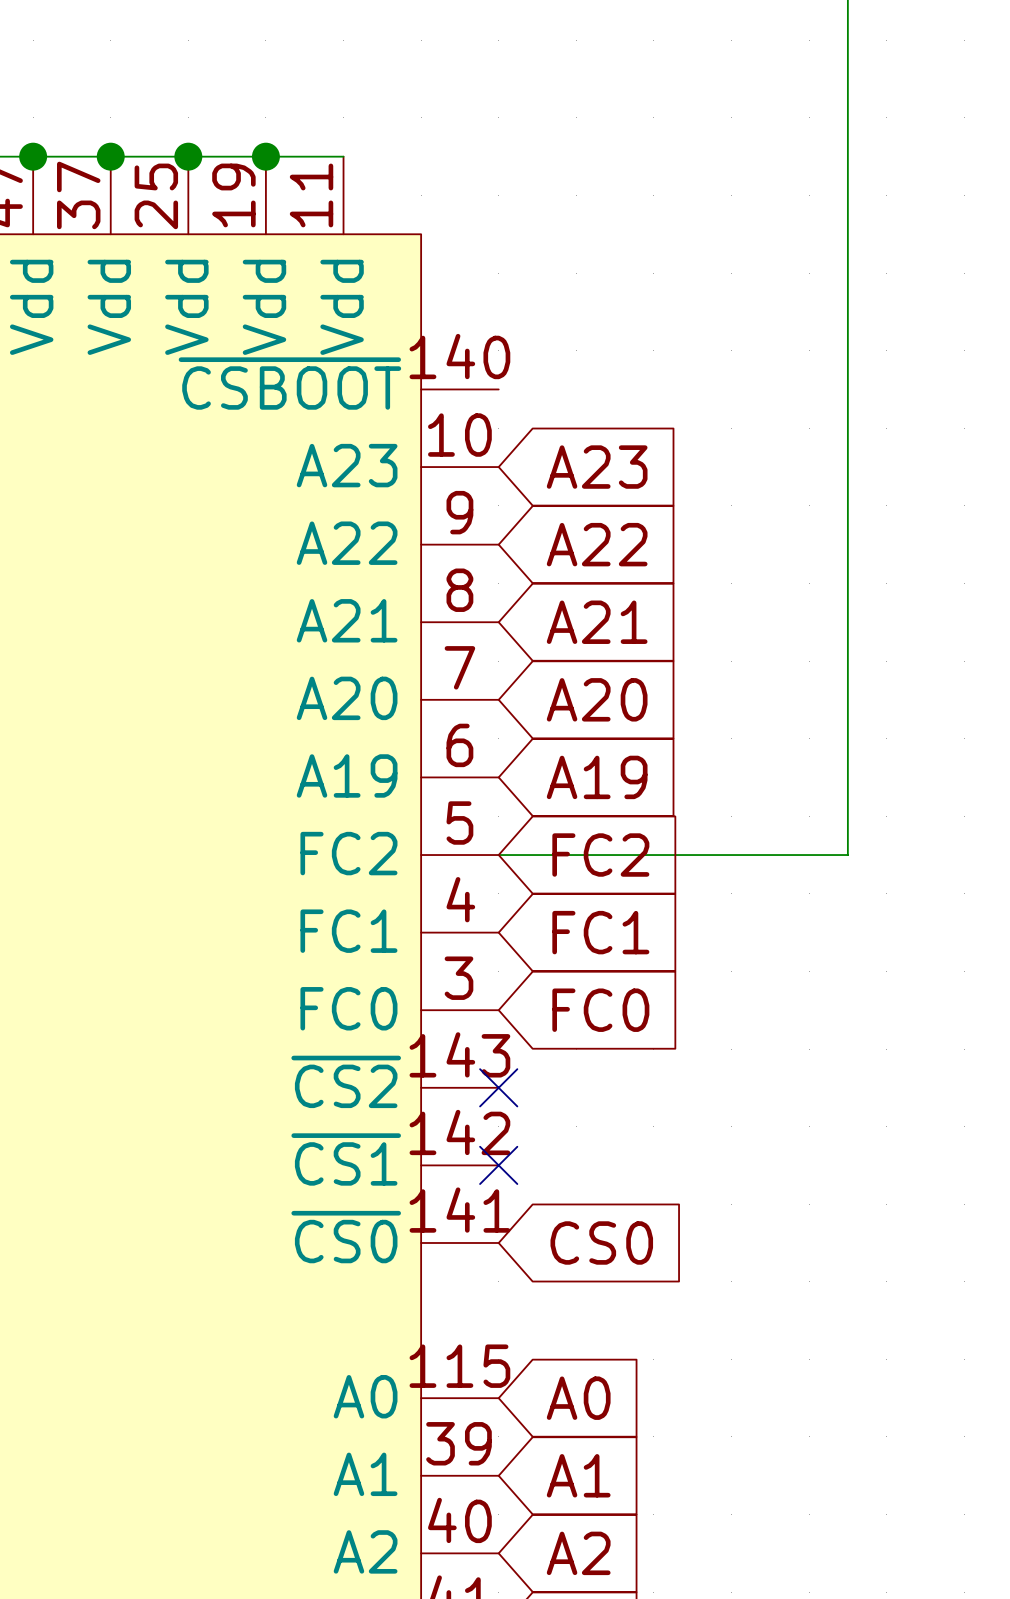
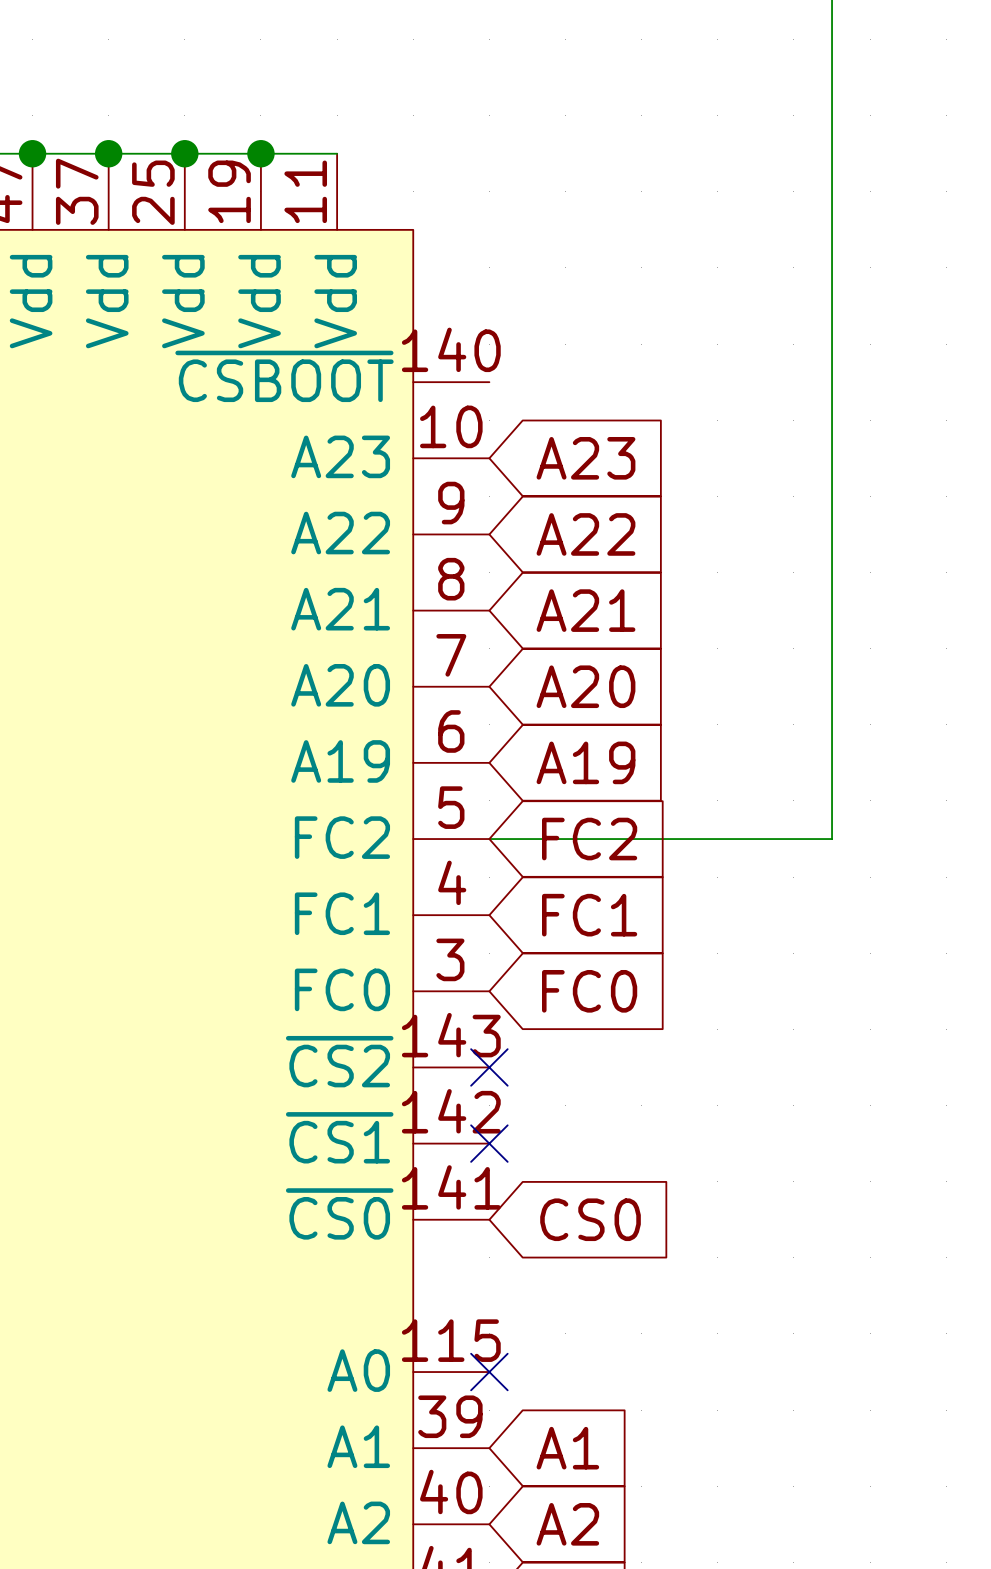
no-connect mark: none -> (489, 1372)
global label: A0 (578, 1398) -> none

